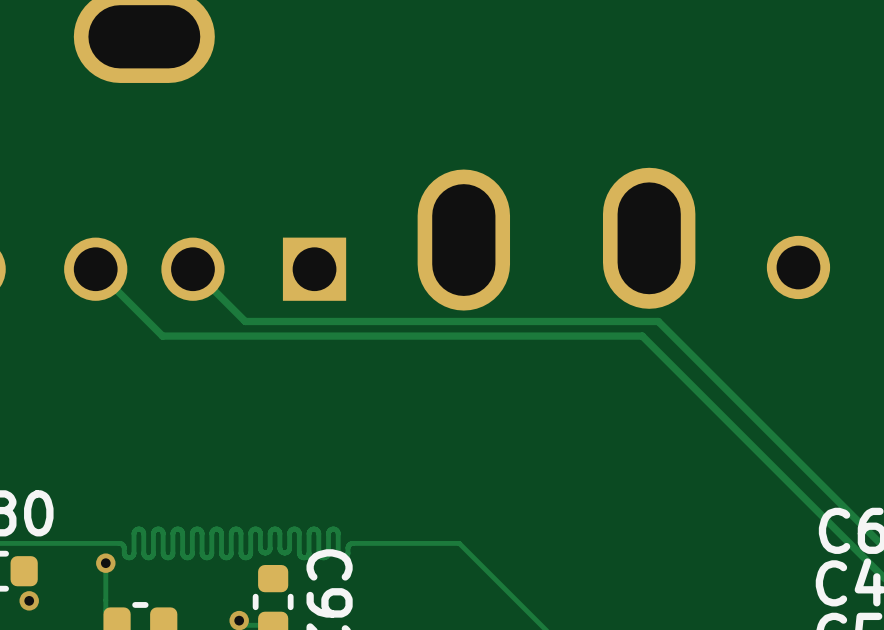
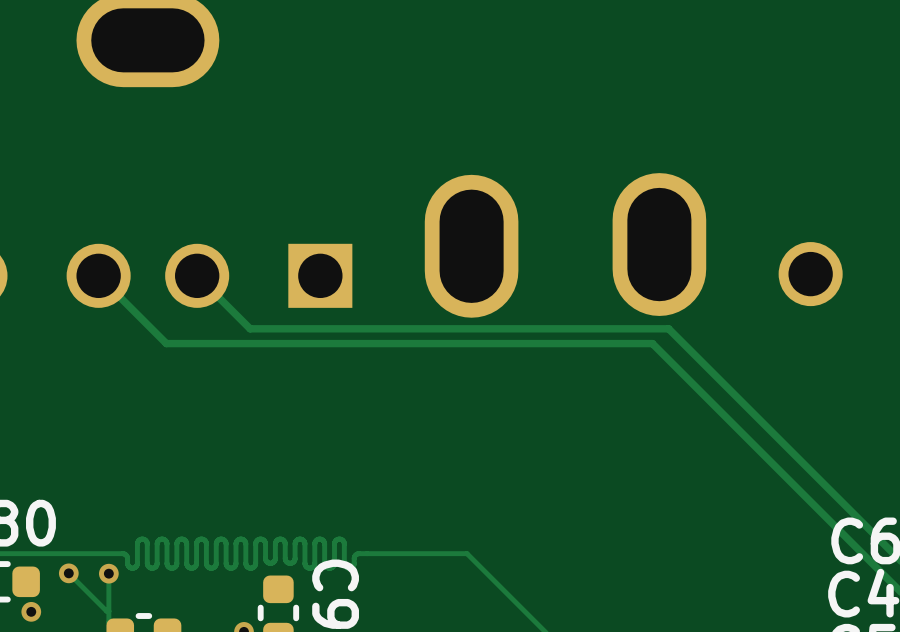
track: none -> (68, 573) (106, 611) (108, 611)
via: none -> (68, 573)

